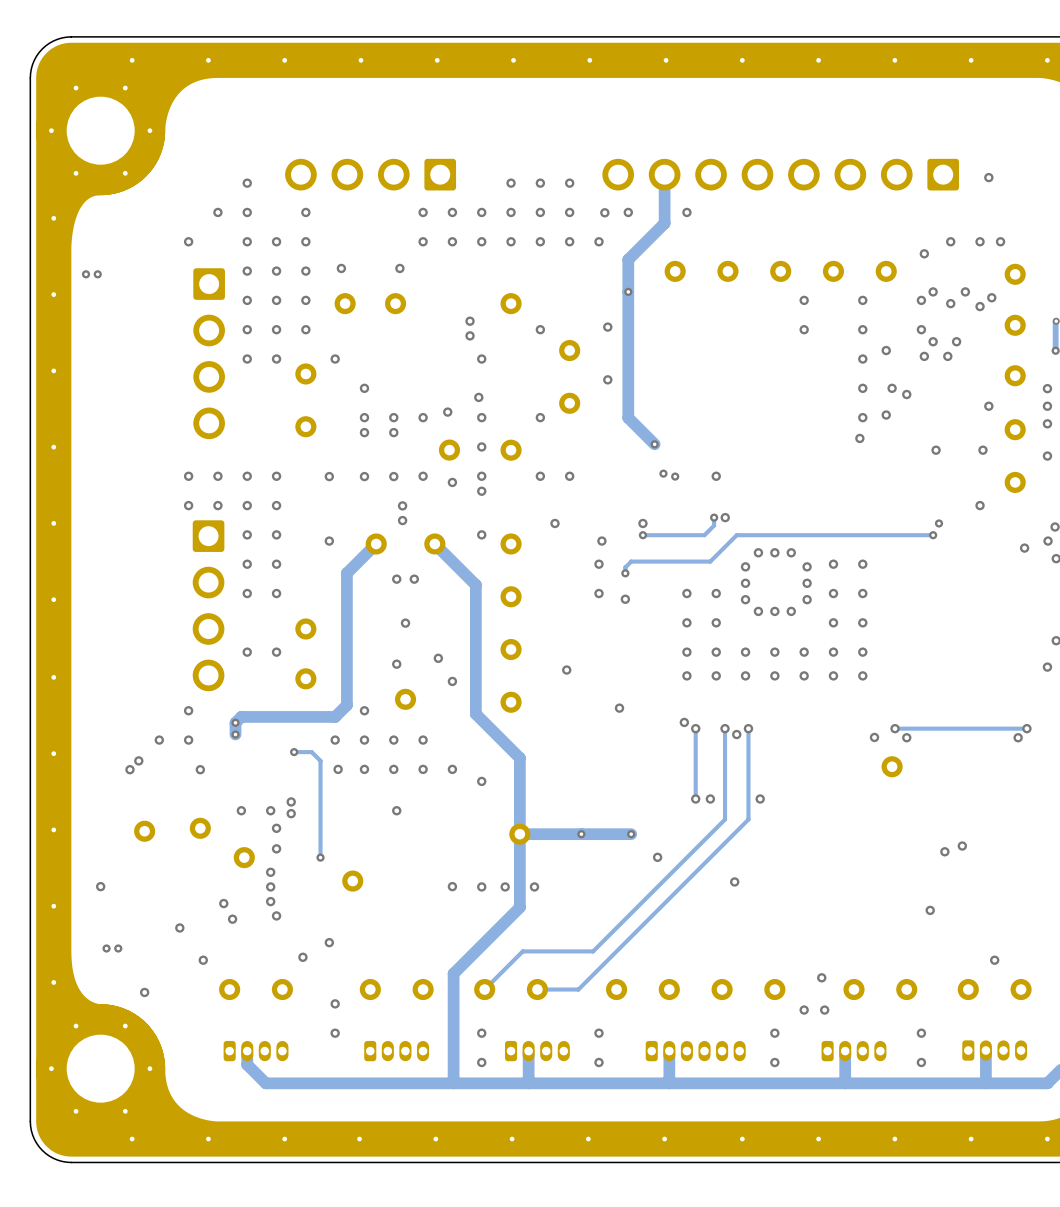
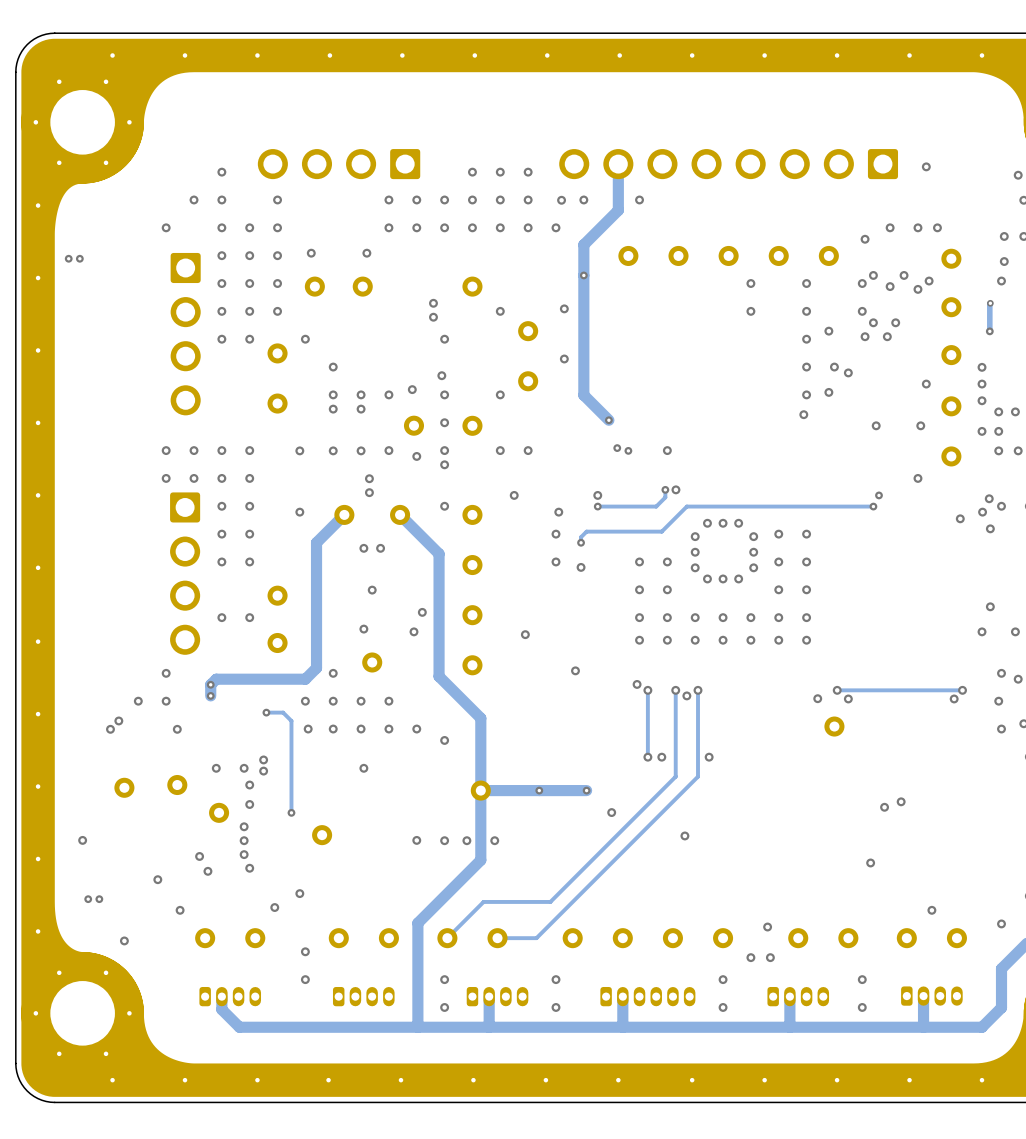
via: none -> (422, 612)
via: (438, 658) -> none
via: none -> (413, 631)
via: (452, 681) -> none

